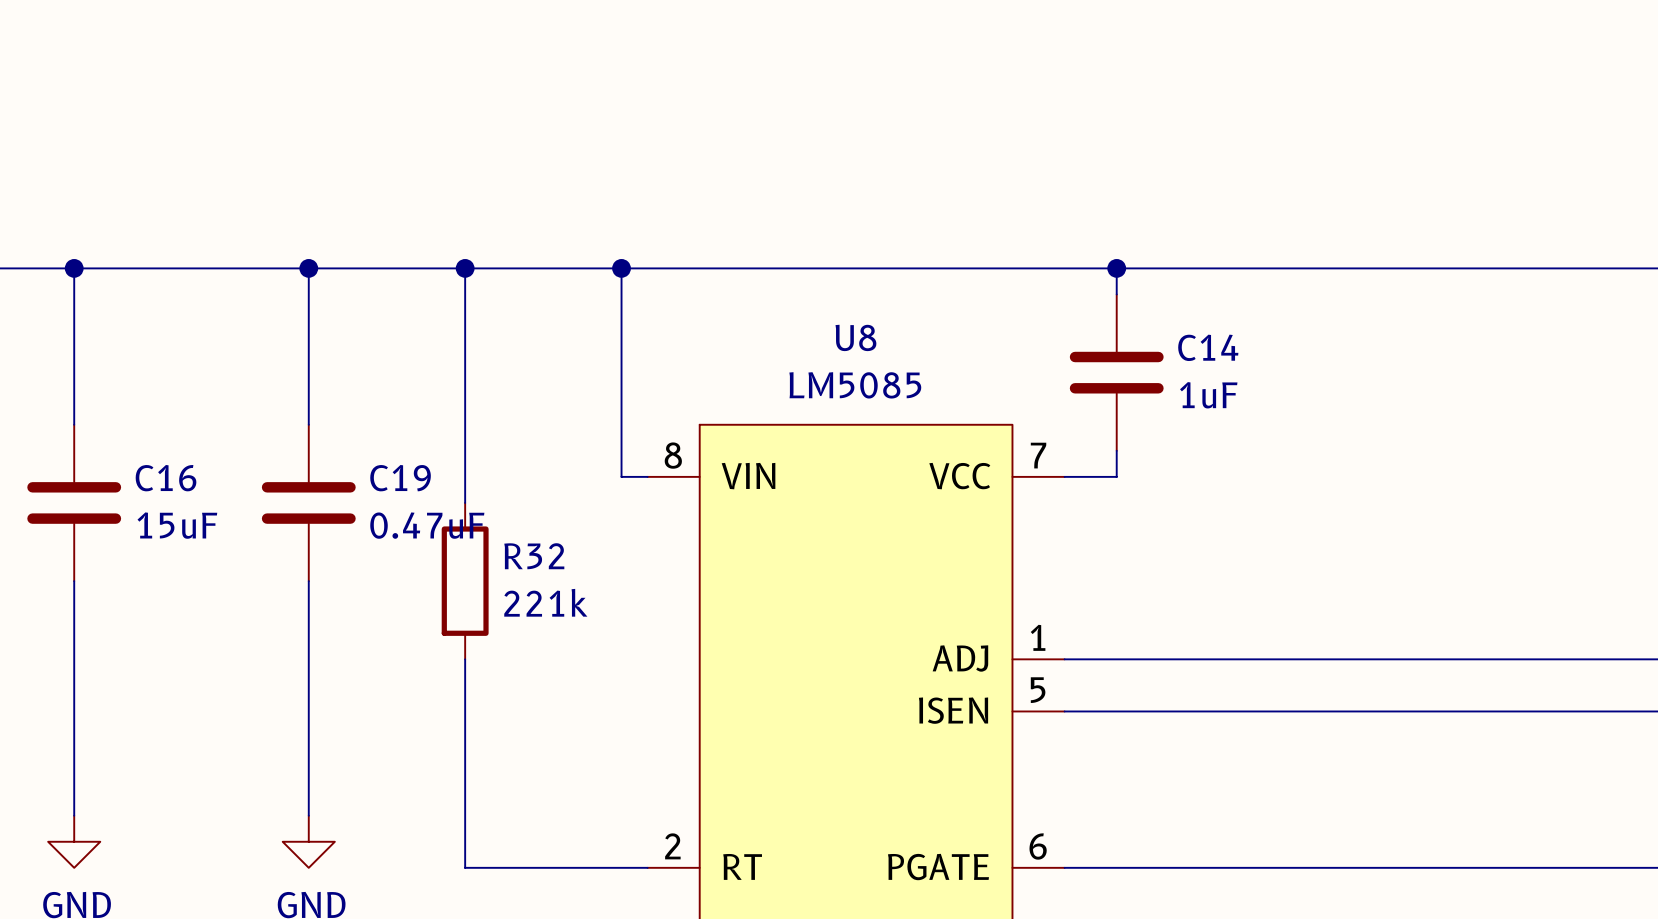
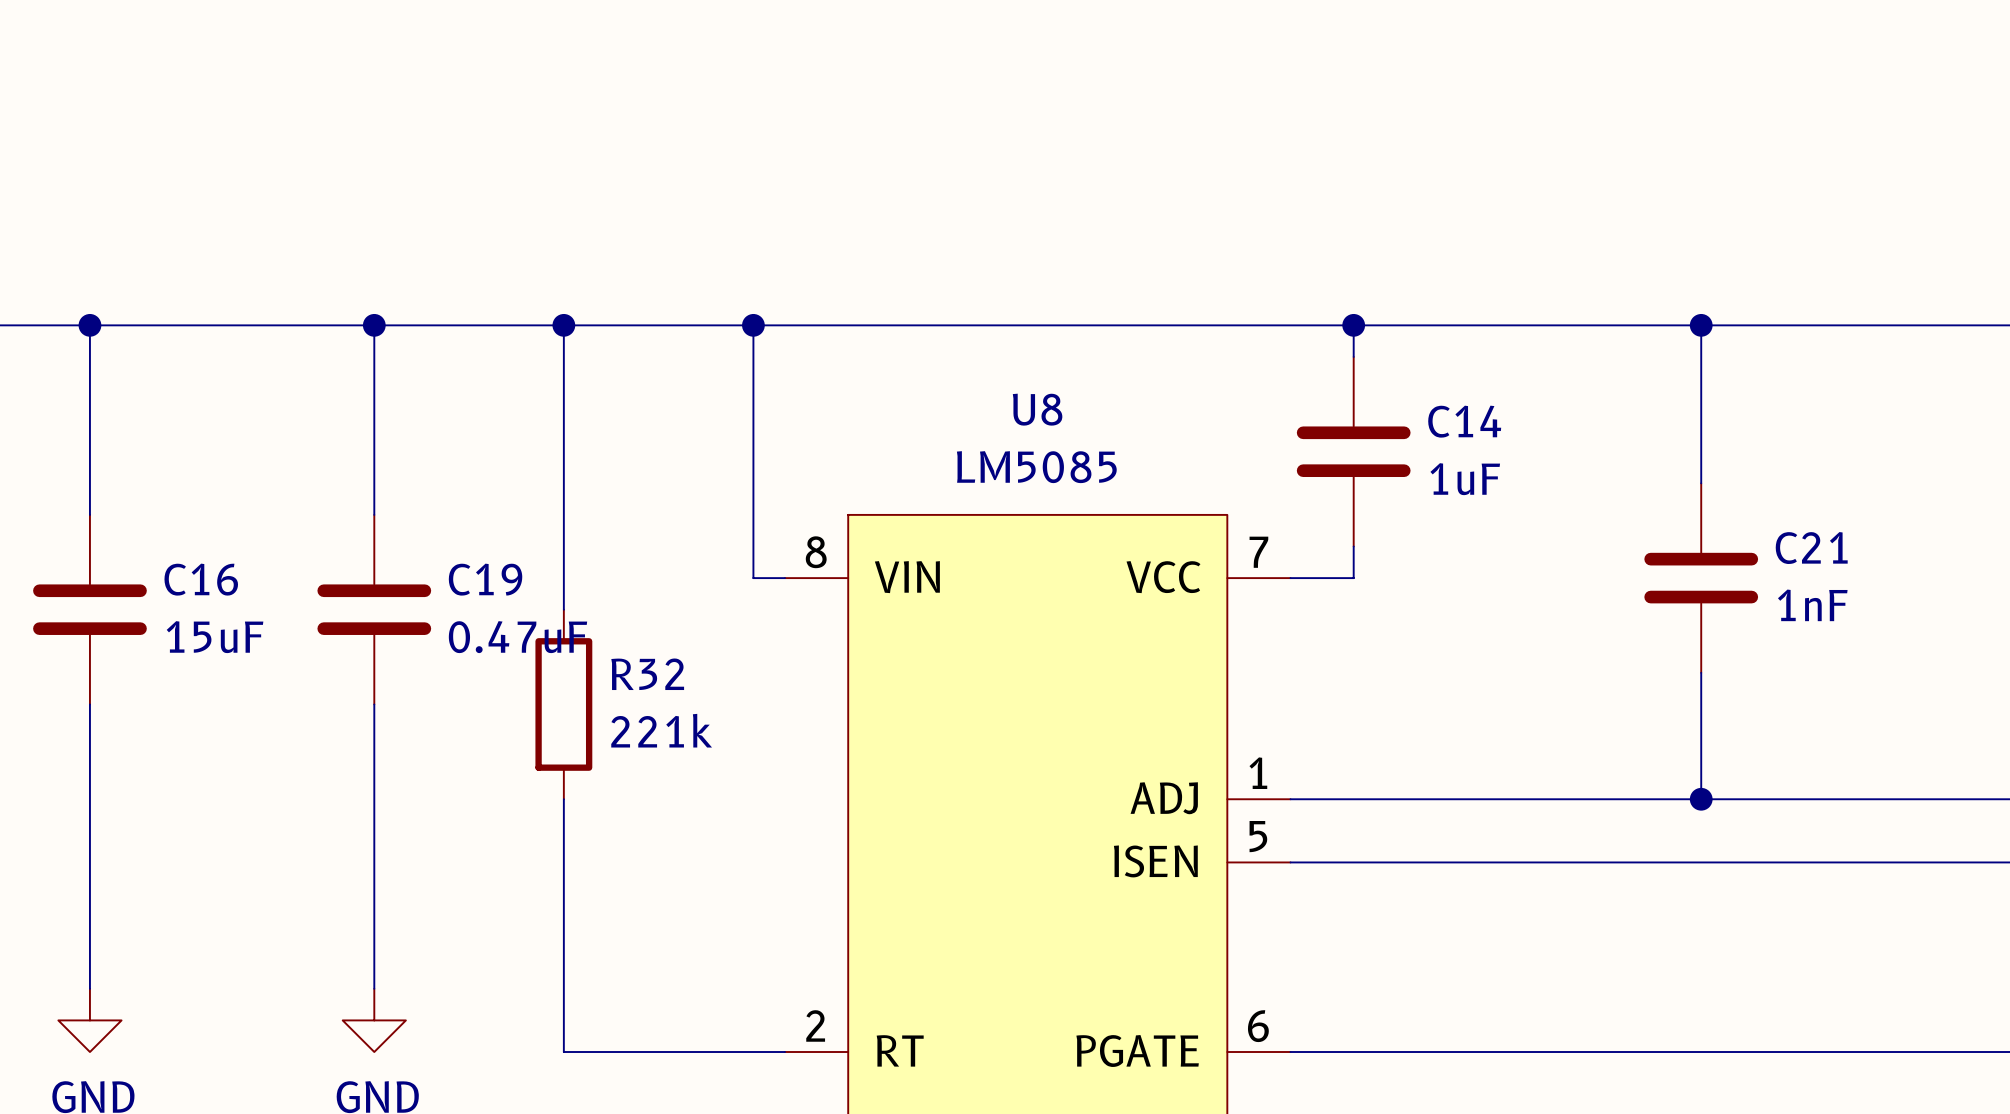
wire: none -> (1701, 325) (1701, 483)
junction: none -> (1701, 325)
C21: none -> 1nF (1701, 578)
wire: none -> (1701, 672) (1701, 799)
junction: none -> (1701, 799)

